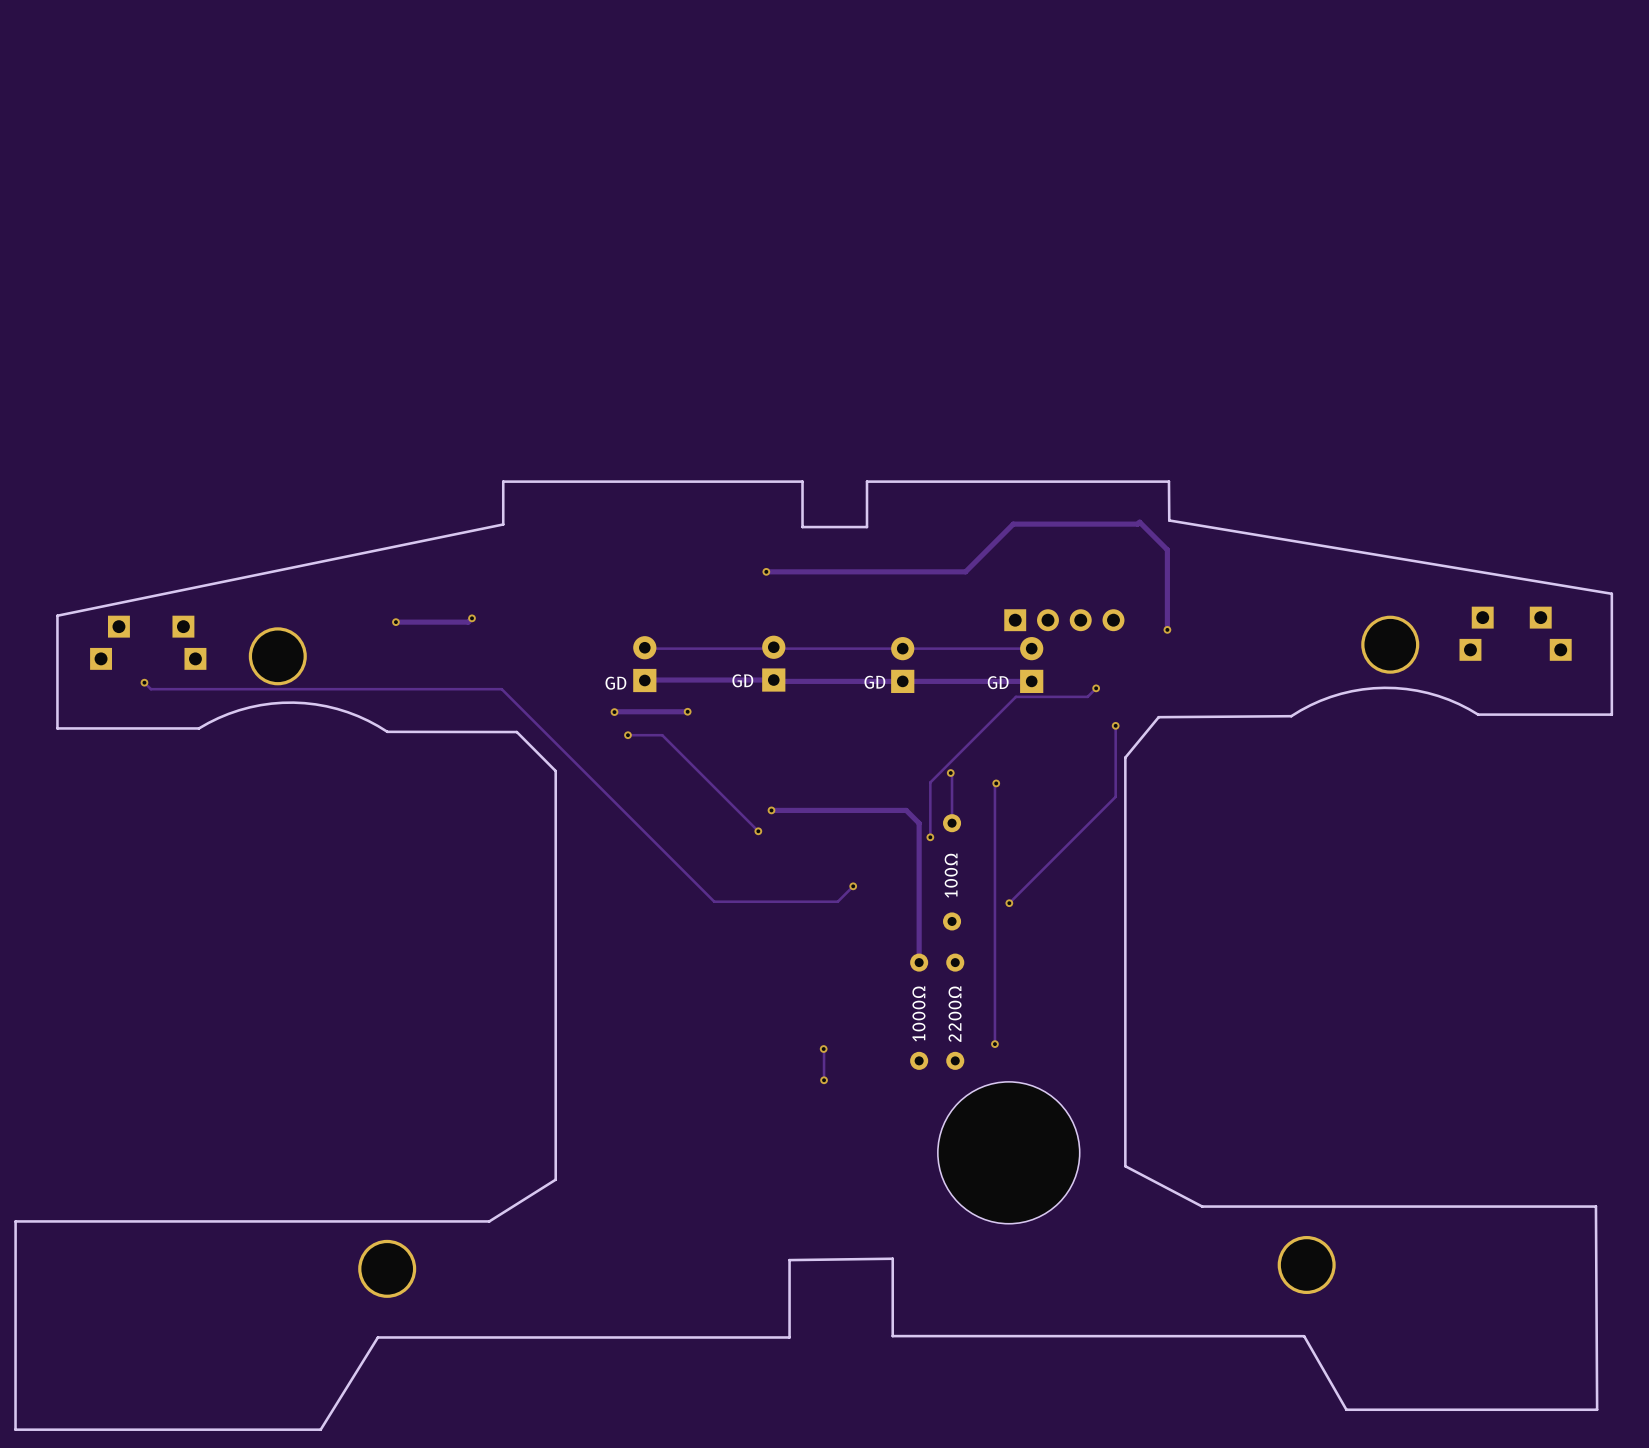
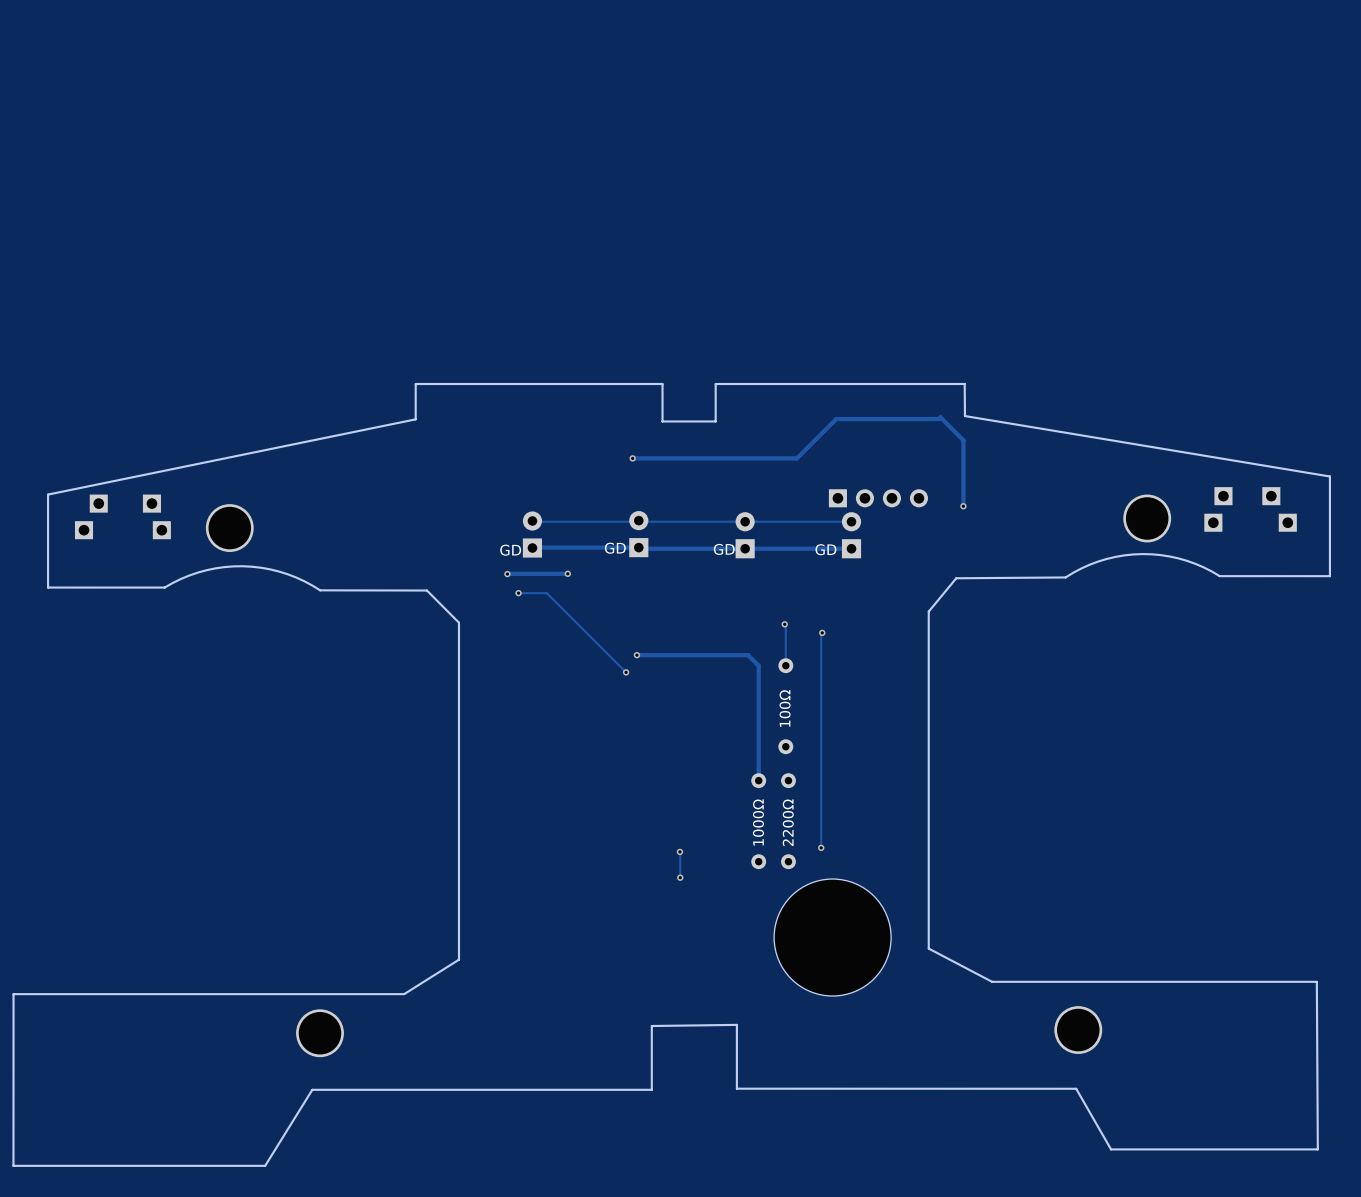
track: (472, 618) (468, 622) (395, 622) -> none
via: (472, 618) -> none
via: (395, 622) -> none
track: (144, 682) (150, 689) (501, 689) (714, 901) (837, 901) (853, 886) -> none
via: (144, 682) -> none
track: (1096, 688) (1087, 696) (1015, 696) (930, 782) (930, 837) -> none
via: (1096, 688) -> none
track: (1115, 725) (1115, 796) (1008, 903) -> none
via: (1115, 725) -> none
via: (930, 837) -> none
via: (853, 886) -> none
via: (1009, 903) -> none

